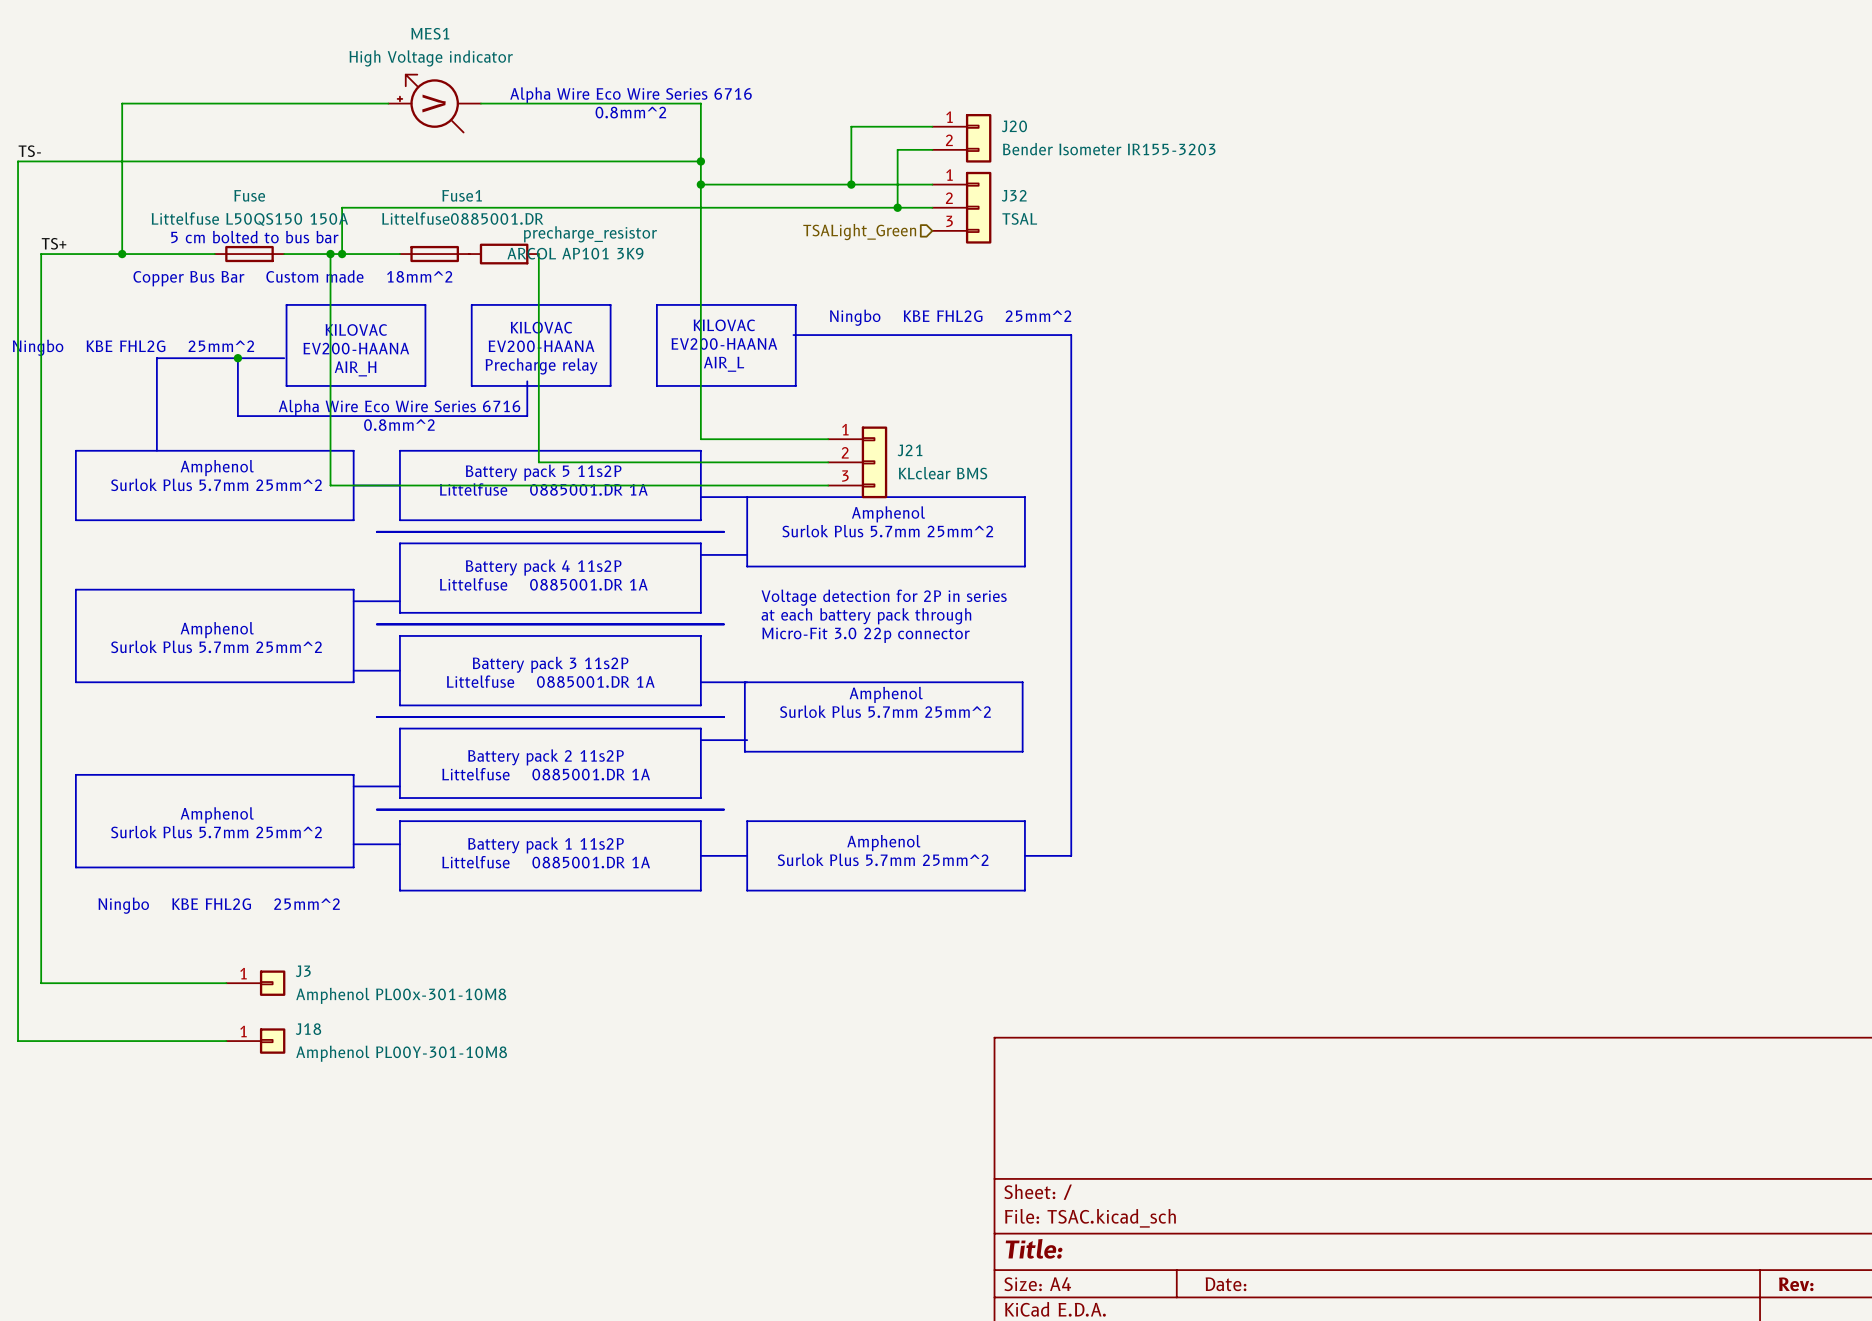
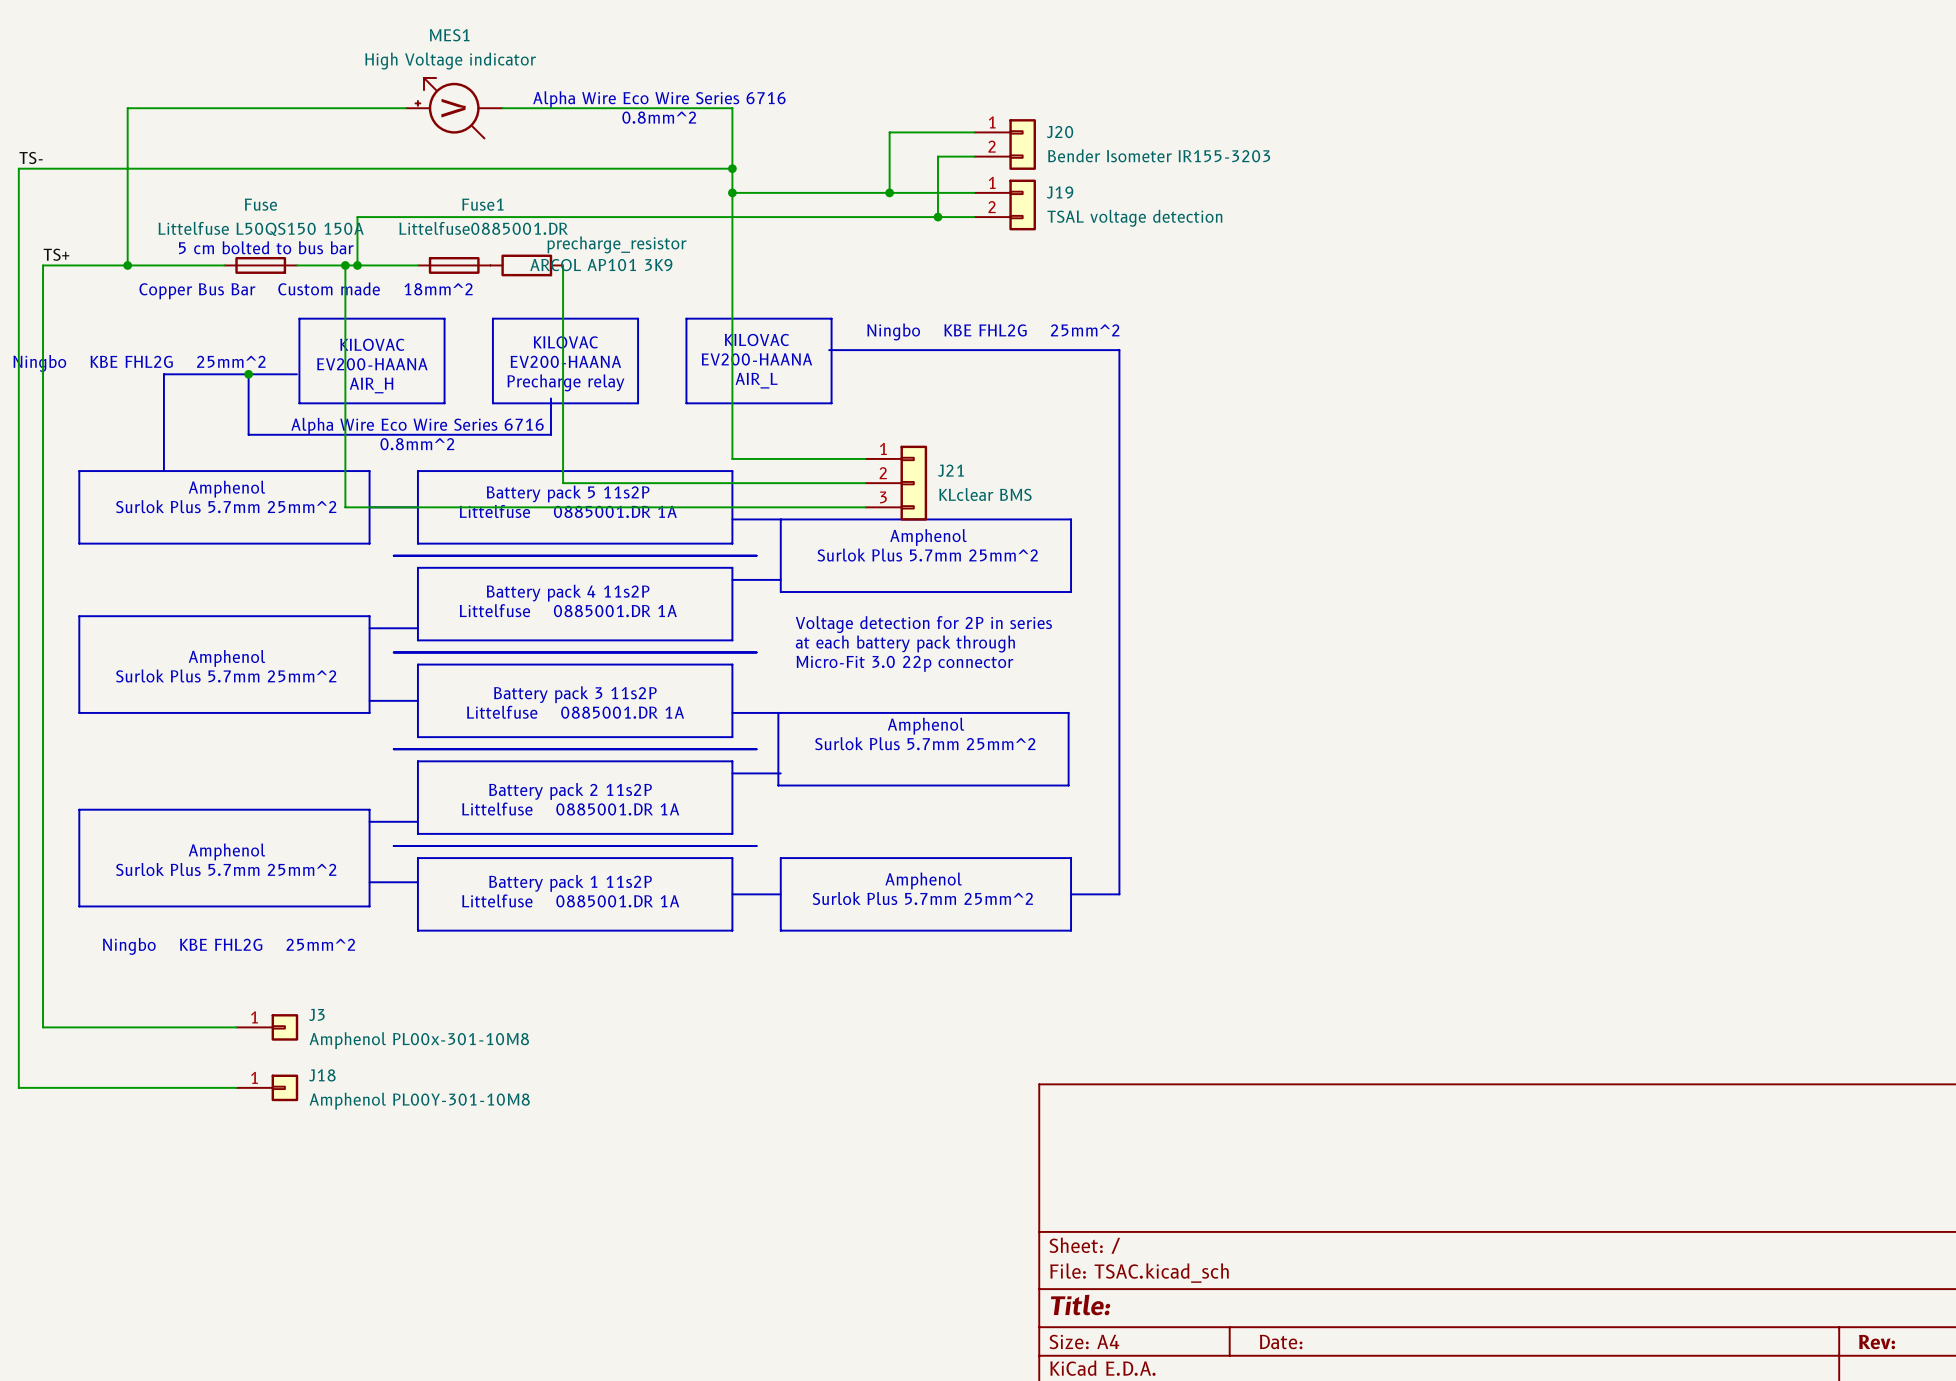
J19: none -> TSAL voltage detection (1005, 204)
J32: TSAL (961, 207) -> none
hierarchical label: TSALight_Green (859, 232) -> none

